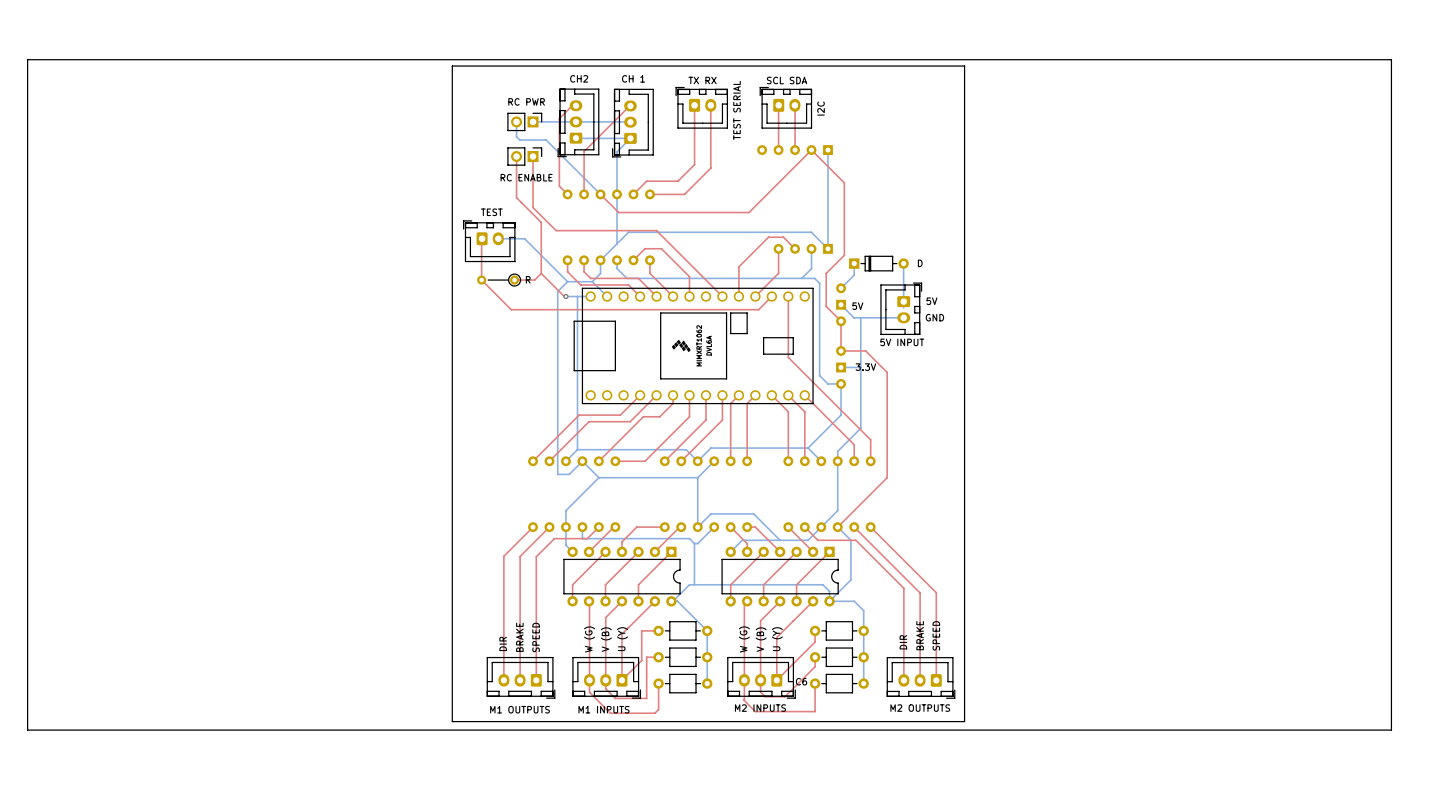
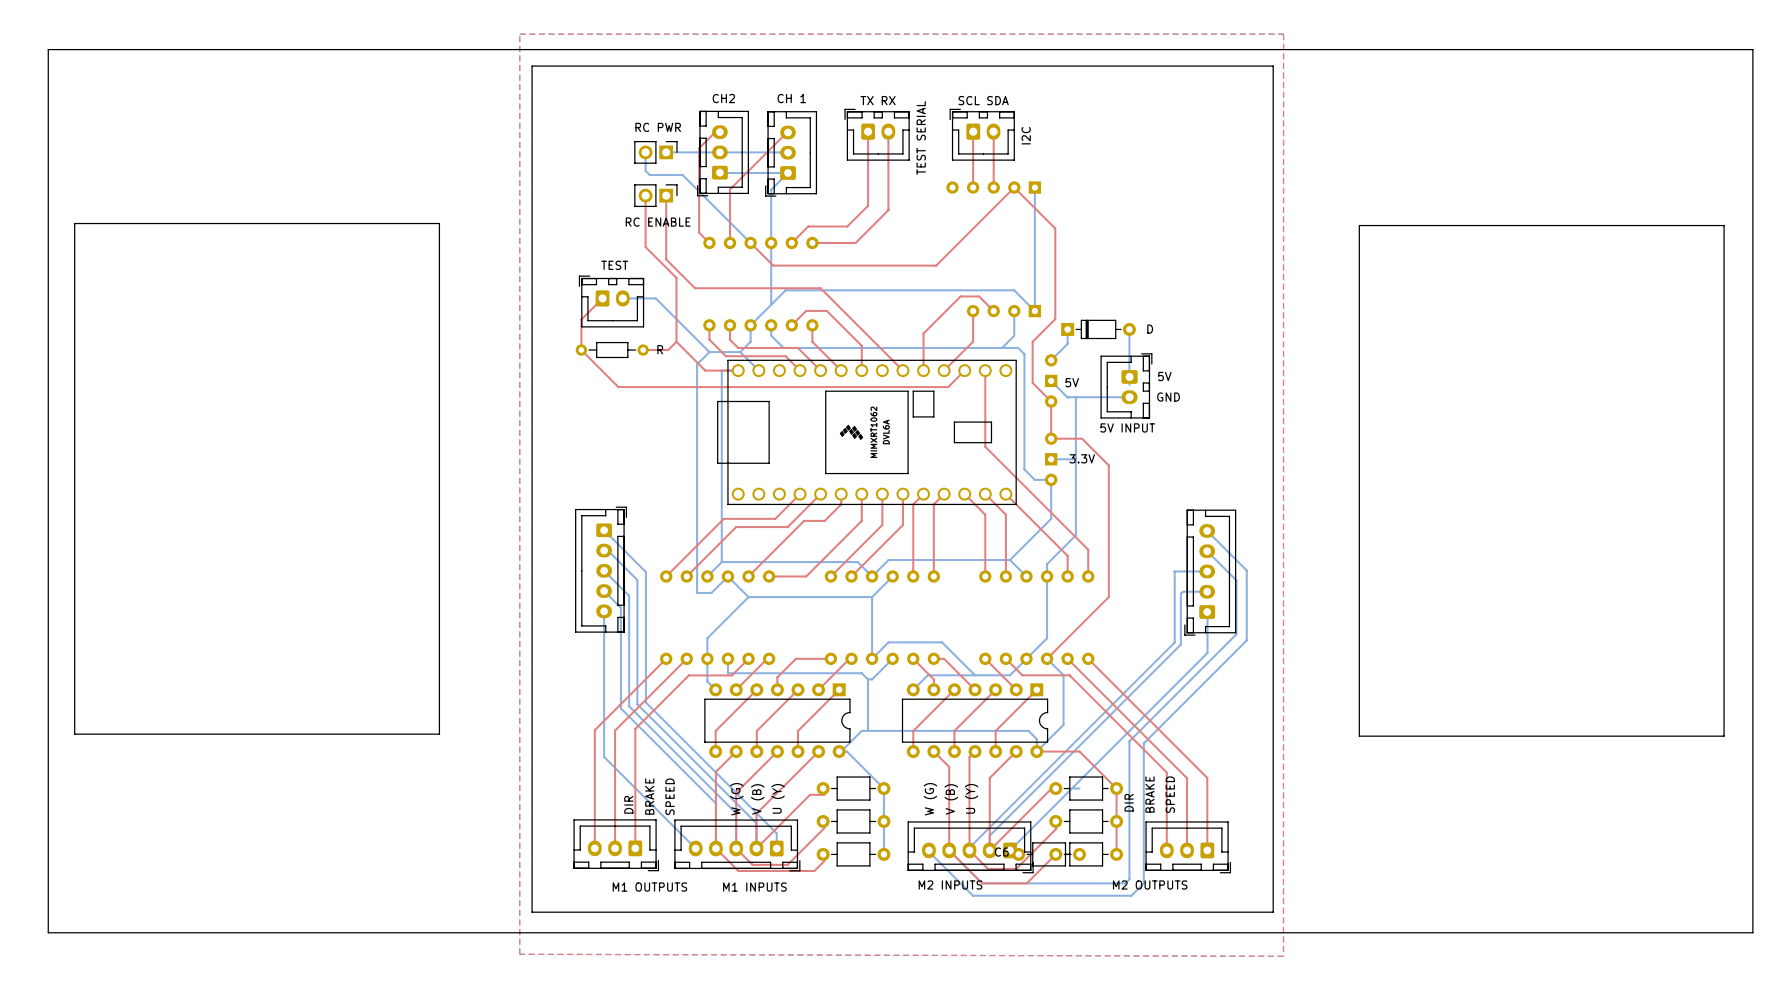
top zone outline: none -> (519, 34) (519, 954) (1283, 956) (1283, 34) (519, 34)
board edge: (27, 59) (1391, 59) (1391, 730) (27, 730) (27, 59) -> (48, 49) (48, 932) (1752, 932) (1752, 49) (48, 49)
line: (452, 66) (964, 66) (964, 721) (452, 721) (452, 66) -> (532, 66) (532, 912) (1273, 912) (1273, 66) (532, 66)
line: none -> (74, 223) (439, 223) (439, 734) (74, 734) (74, 223)
line: none -> (1359, 225) (1724, 225) (1724, 736) (1359, 736) (1359, 225)
top track: (481, 239) (481, 280) (511, 309) -> (601, 298) (581, 319) (581, 350) (618, 387) (639, 387)
part: none -> (612, 350)
part: (499, 280) -> none
bottom track: (565, 296) (577, 296) -> none
top track: none -> (707, 370) (738, 370)
via: (565, 296) -> none
bottom track: none -> (604, 530) (645, 572) (645, 702) (776, 833) (776, 848)
bottom track: none -> (1207, 530) (1246, 570) (1246, 640) (1143, 743) (1143, 883) (1131, 895) (972, 895) (928, 851)
bottom track: none -> (607, 550) (637, 580) (637, 704) (756, 823) (756, 848)
bottom track: none -> (1207, 551) (1236, 580) (1236, 634) (1129, 741) (1129, 879) (1125, 883) (982, 883) (949, 850)
part: none -> (601, 569)
bottom track: none -> (604, 570) (629, 595) (629, 706) (736, 813) (736, 848)
bottom track: none -> (1207, 571) (1174, 571) (1174, 642) (969, 847)
part: none -> (1210, 572)
bottom track: none -> (604, 591) (620, 607) (620, 708) (715, 803) (715, 848)
bottom track: none -> (1207, 591) (1182, 591) (1180, 593) (1180, 644) (989, 835) (989, 850)
bottom track: none -> (604, 611) (604, 756) (695, 848)
bottom track: none -> (1207, 612) (1207, 652) (1010, 850)
top track: (587, 538) (554, 538) (536, 556) (536, 680) -> (734, 673) (731, 675) (688, 675) (635, 728) (635, 848)
top track: (855, 540) (903, 588) (903, 680) -> (1069, 675) (1166, 772) (1166, 850)
top track: (503, 556) (503, 680) -> (629, 695) (594, 730) (594, 848)
top track: (520, 556) (520, 680) -> (650, 695) (615, 730) (615, 848)
top track: (936, 592) (936, 680) -> (1170, 740) (1207, 777) (1207, 850)
top track: (920, 593) (920, 680) -> (1150, 741) (1187, 778) (1187, 850)
top track: (589, 601) (589, 692) (610, 713) (654, 713) (658, 709) (658, 683) -> (736, 751) (715, 771) (715, 848) (738, 871) (814, 871) (824, 860)
top track: (747, 601) (744, 604) (743, 700) (755, 711) (815, 711) (815, 683) -> (933, 751) (949, 766) (949, 850) (982, 883) (1026, 883) (1055, 854)
bottom track: (829, 601) (854, 601) (863, 610) (863, 683) -> none
top track: none -> (1036, 751) (1079, 751) (1116, 788) (1116, 854)
top track: (775, 605) (760, 620) (760, 692) (765, 696) (785, 696) (815, 666) (815, 657) -> (969, 757) (969, 850) (988, 868) (1016, 868) (1055, 829) (1055, 821)
top track: (605, 617) (605, 688) (615, 698) (646, 698) (646, 657) (658, 657) -> (757, 771) (736, 792) (736, 848) (752, 864) (787, 864) (824, 827)
top track: (793, 621) (776, 637) (776, 680) (815, 642) (815, 630) -> (991, 776) (989, 778) (989, 850) (1051, 788)
top track: (628, 627) (621, 634) (621, 680) (641, 660) (641, 630) (658, 630) -> (785, 784) (756, 813) (756, 848) (810, 794) (824, 794)
part: (839, 630) -> none
part: none -> (1086, 788)
part: (839, 657) -> none
part: none -> (1086, 821)
part: none -> (737, 845)
part position: (521, 677) -> (616, 845)
part: (606, 677) -> none
part: (761, 677) -> none
part: none -> (970, 847)
part position: (921, 677) -> (1188, 847)
part: none -> (1086, 854)

